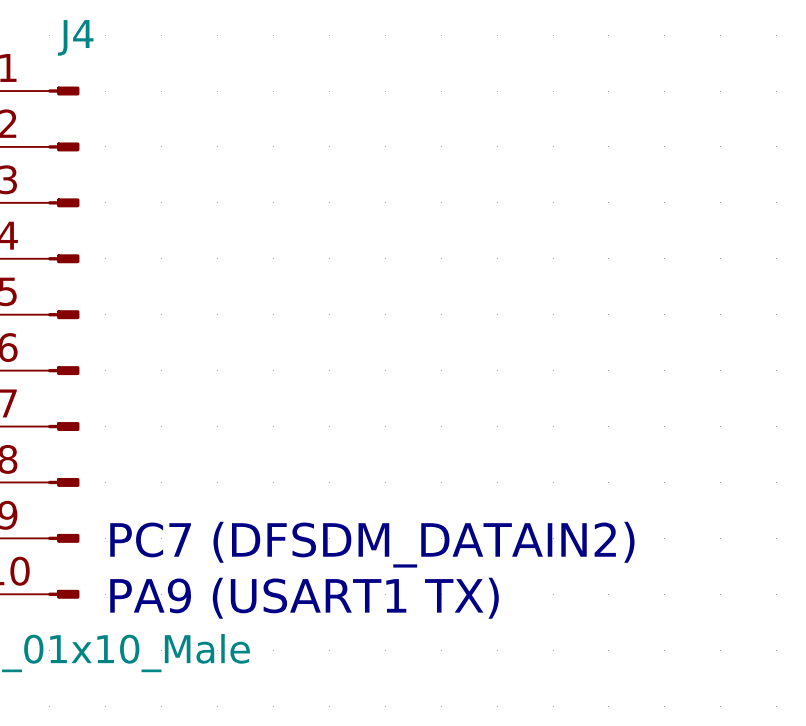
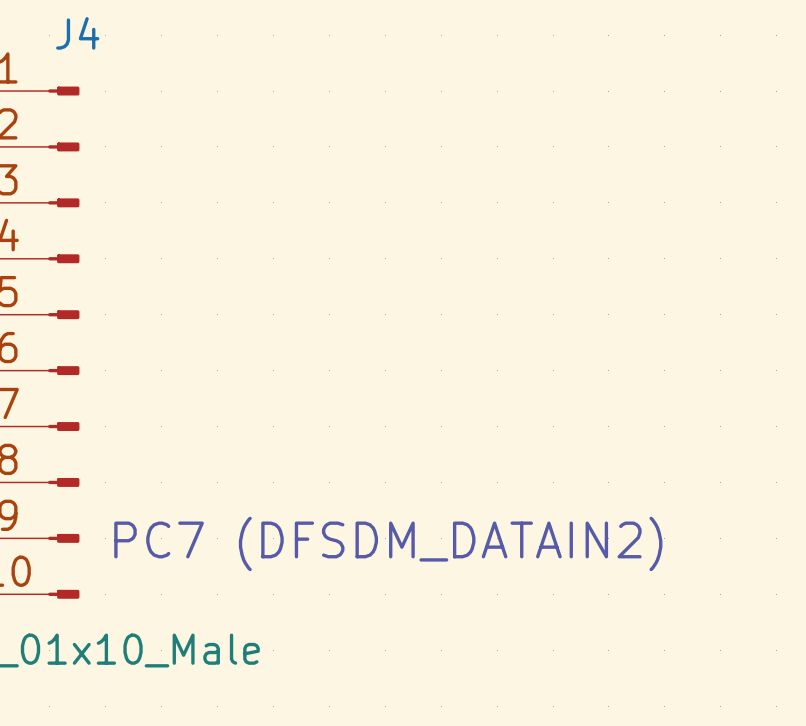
text: PA9 (USART1 TX) (304, 598) -> none

